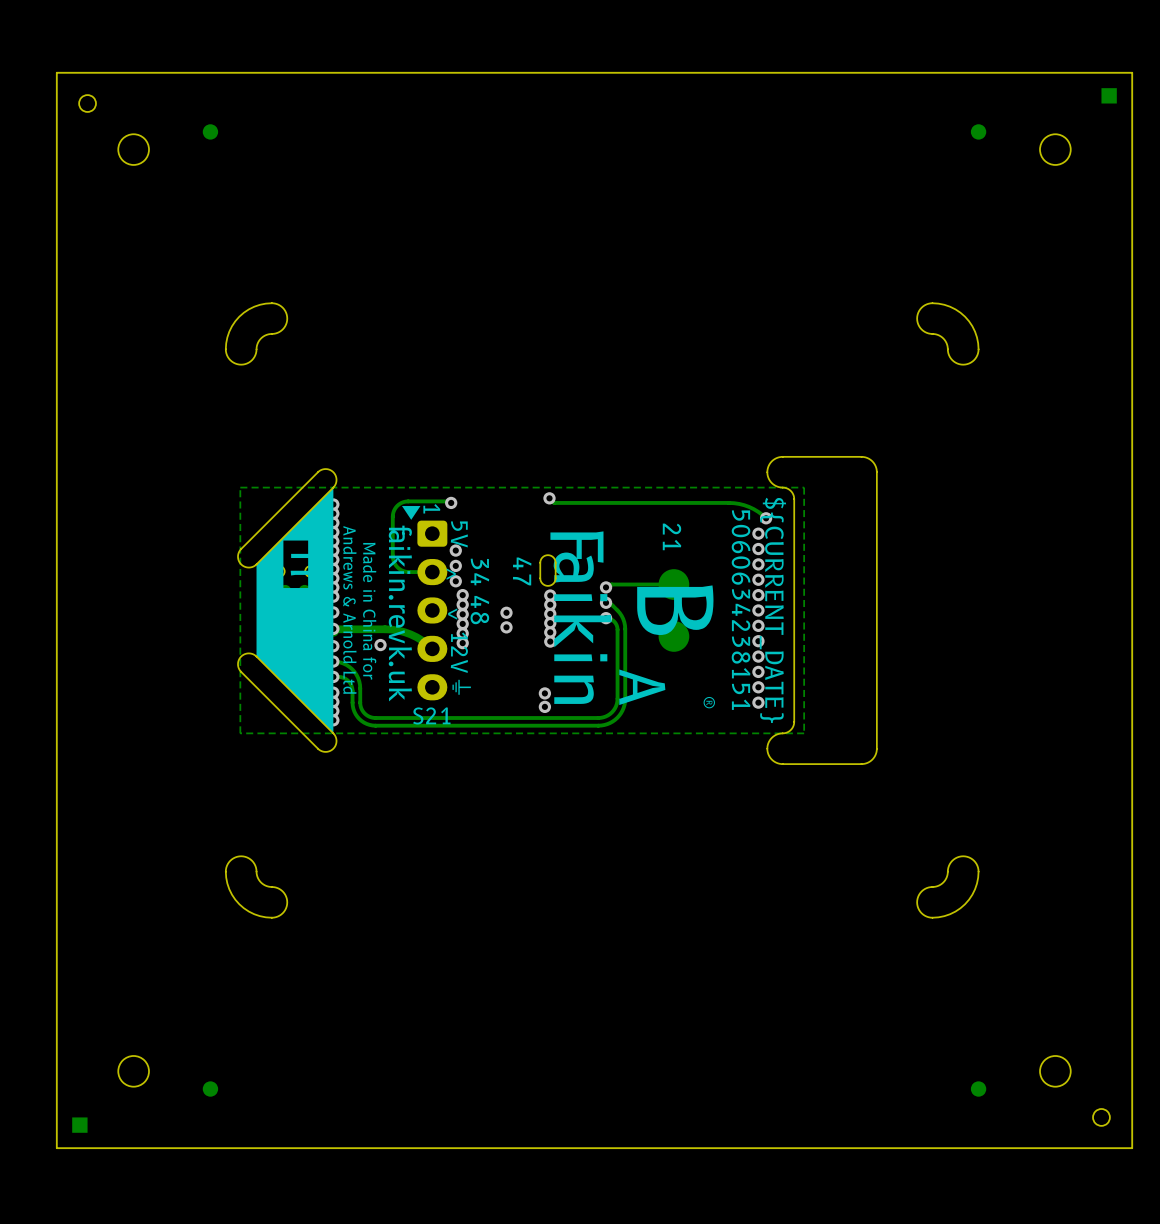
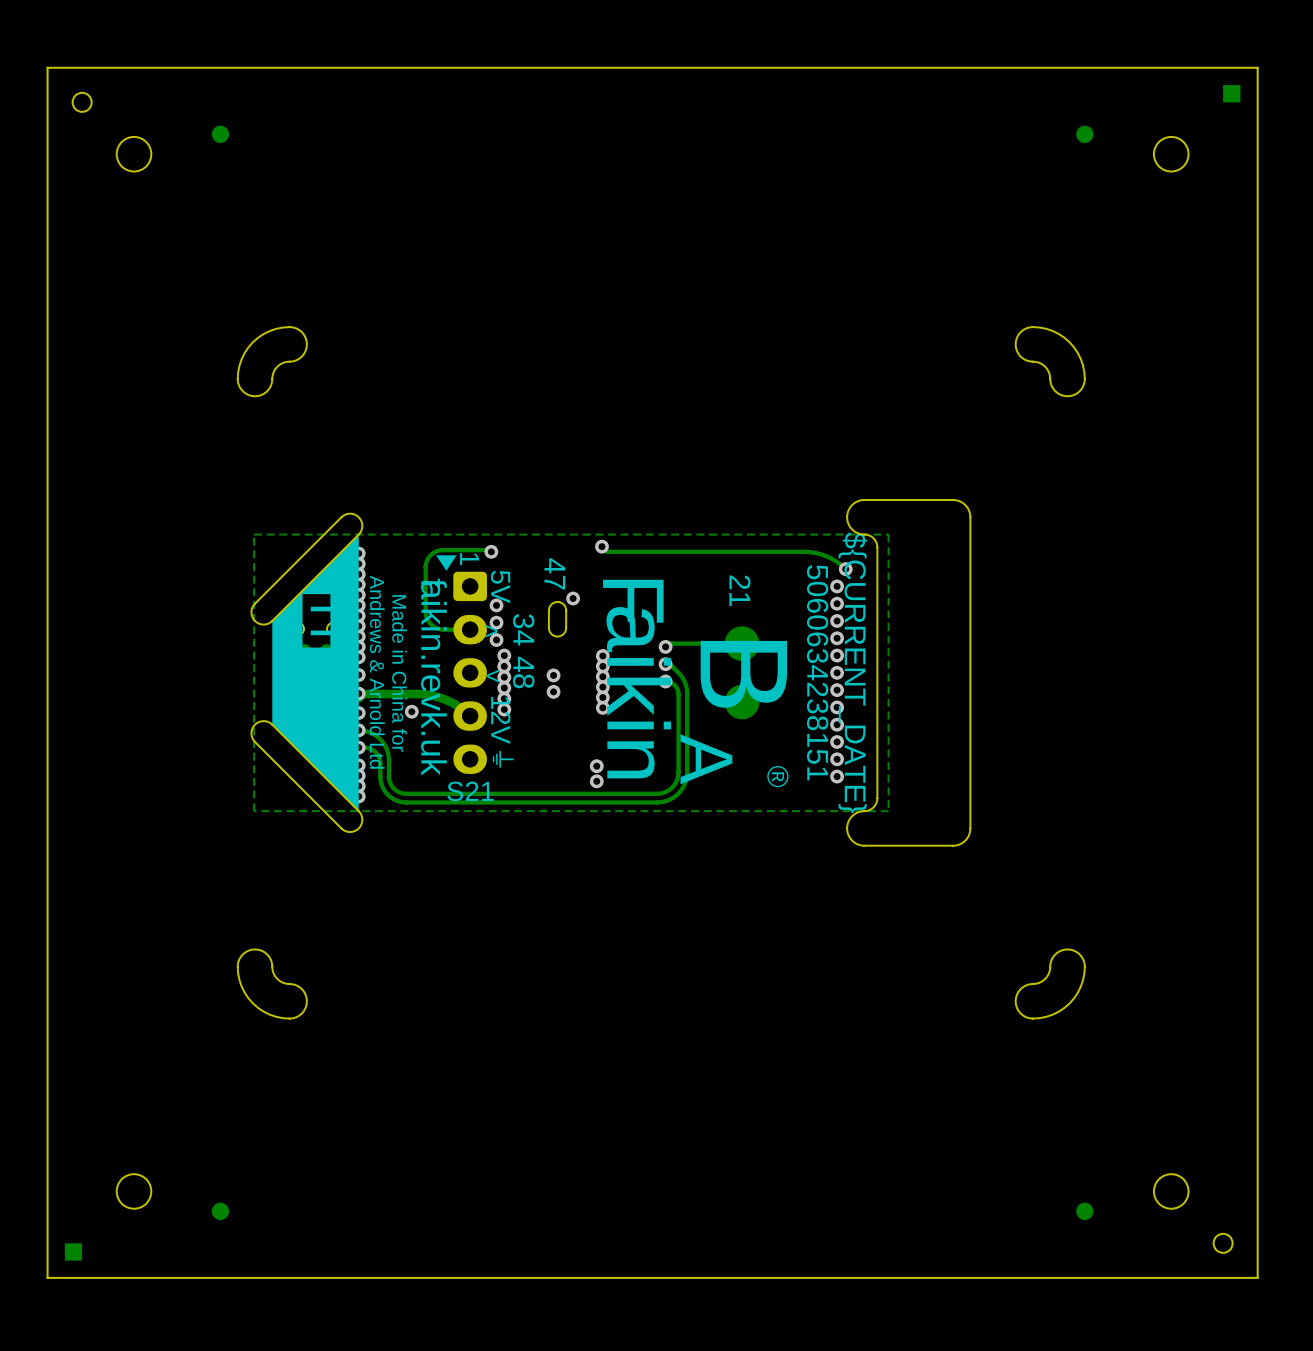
via: none -> (573, 598)
board edge: (555, 562) (554, 581) (550, 585) (544, 585) (540, 579) (541, 559) (544, 556) (549, 555) (553, 557) (555, 562) -> (566, 610) (565, 631) (560, 635) (553, 635) (548, 628) (549, 606) (553, 602) (559, 602) (564, 605) (566, 610)
text position: 47 (522, 571) -> 47 (554, 573)

